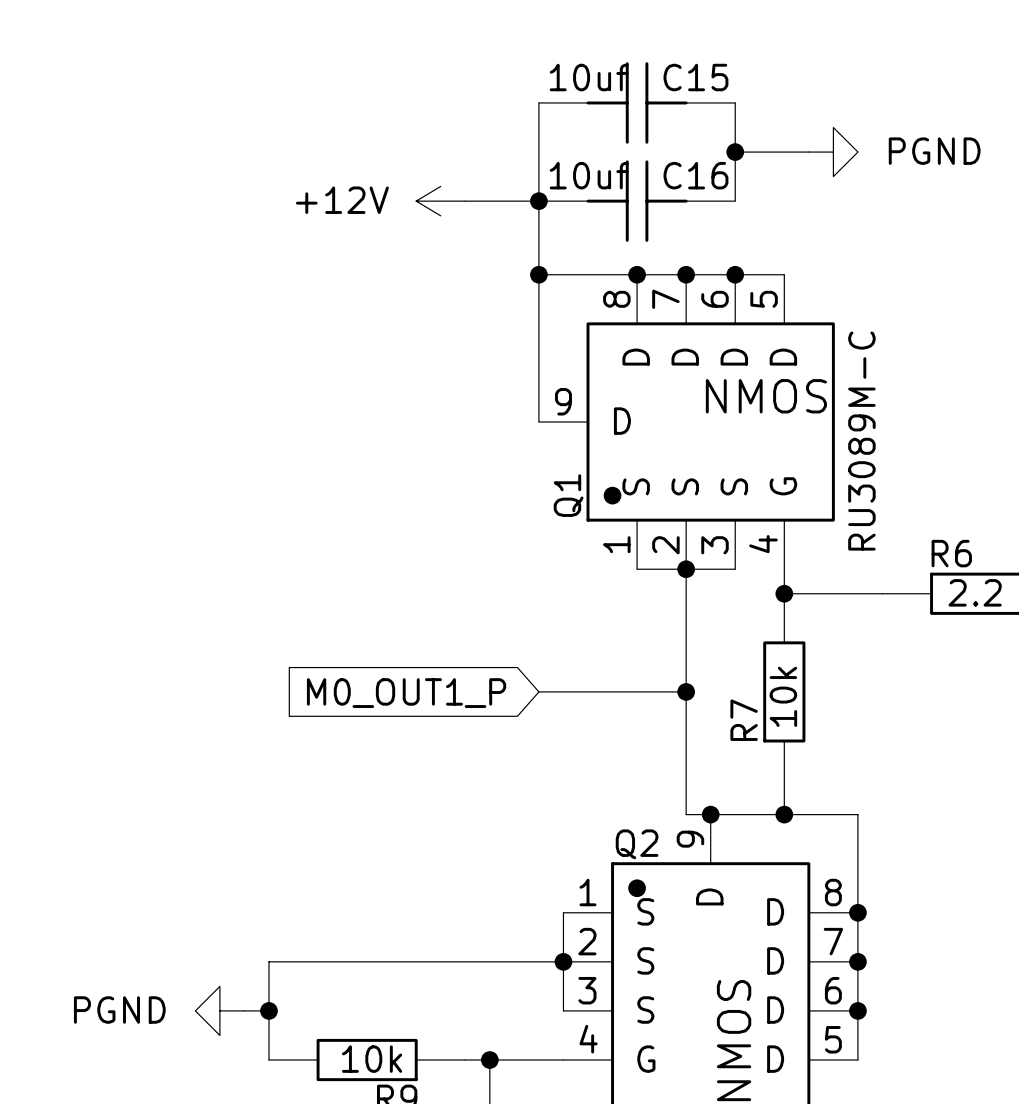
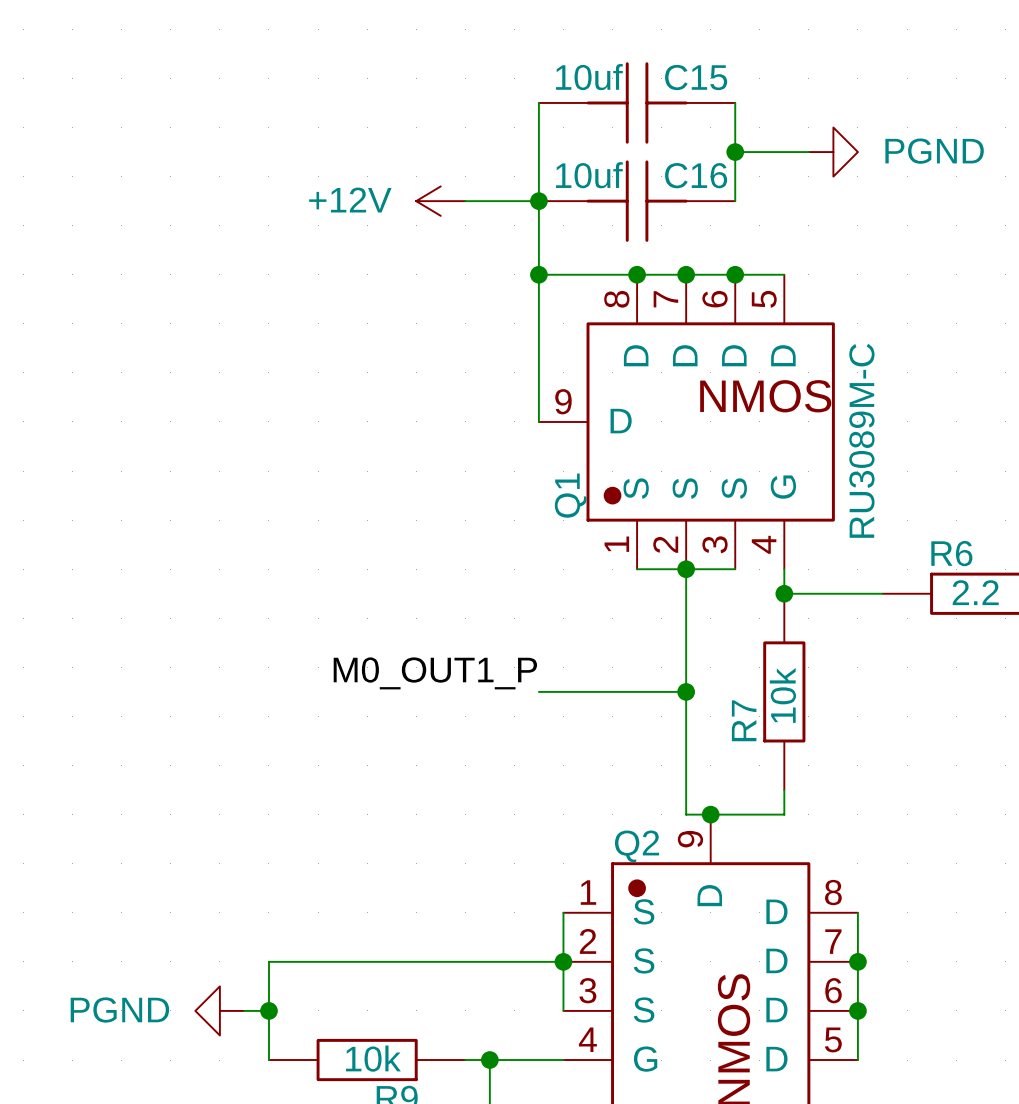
label: none -> M0_OUT1_P (435, 673)
global label: M0_OUT1_P (406, 693) -> none
wire: (784, 814) (857, 814) (857, 912) -> none
junction: (784, 814) -> none
junction: (857, 912) -> none

